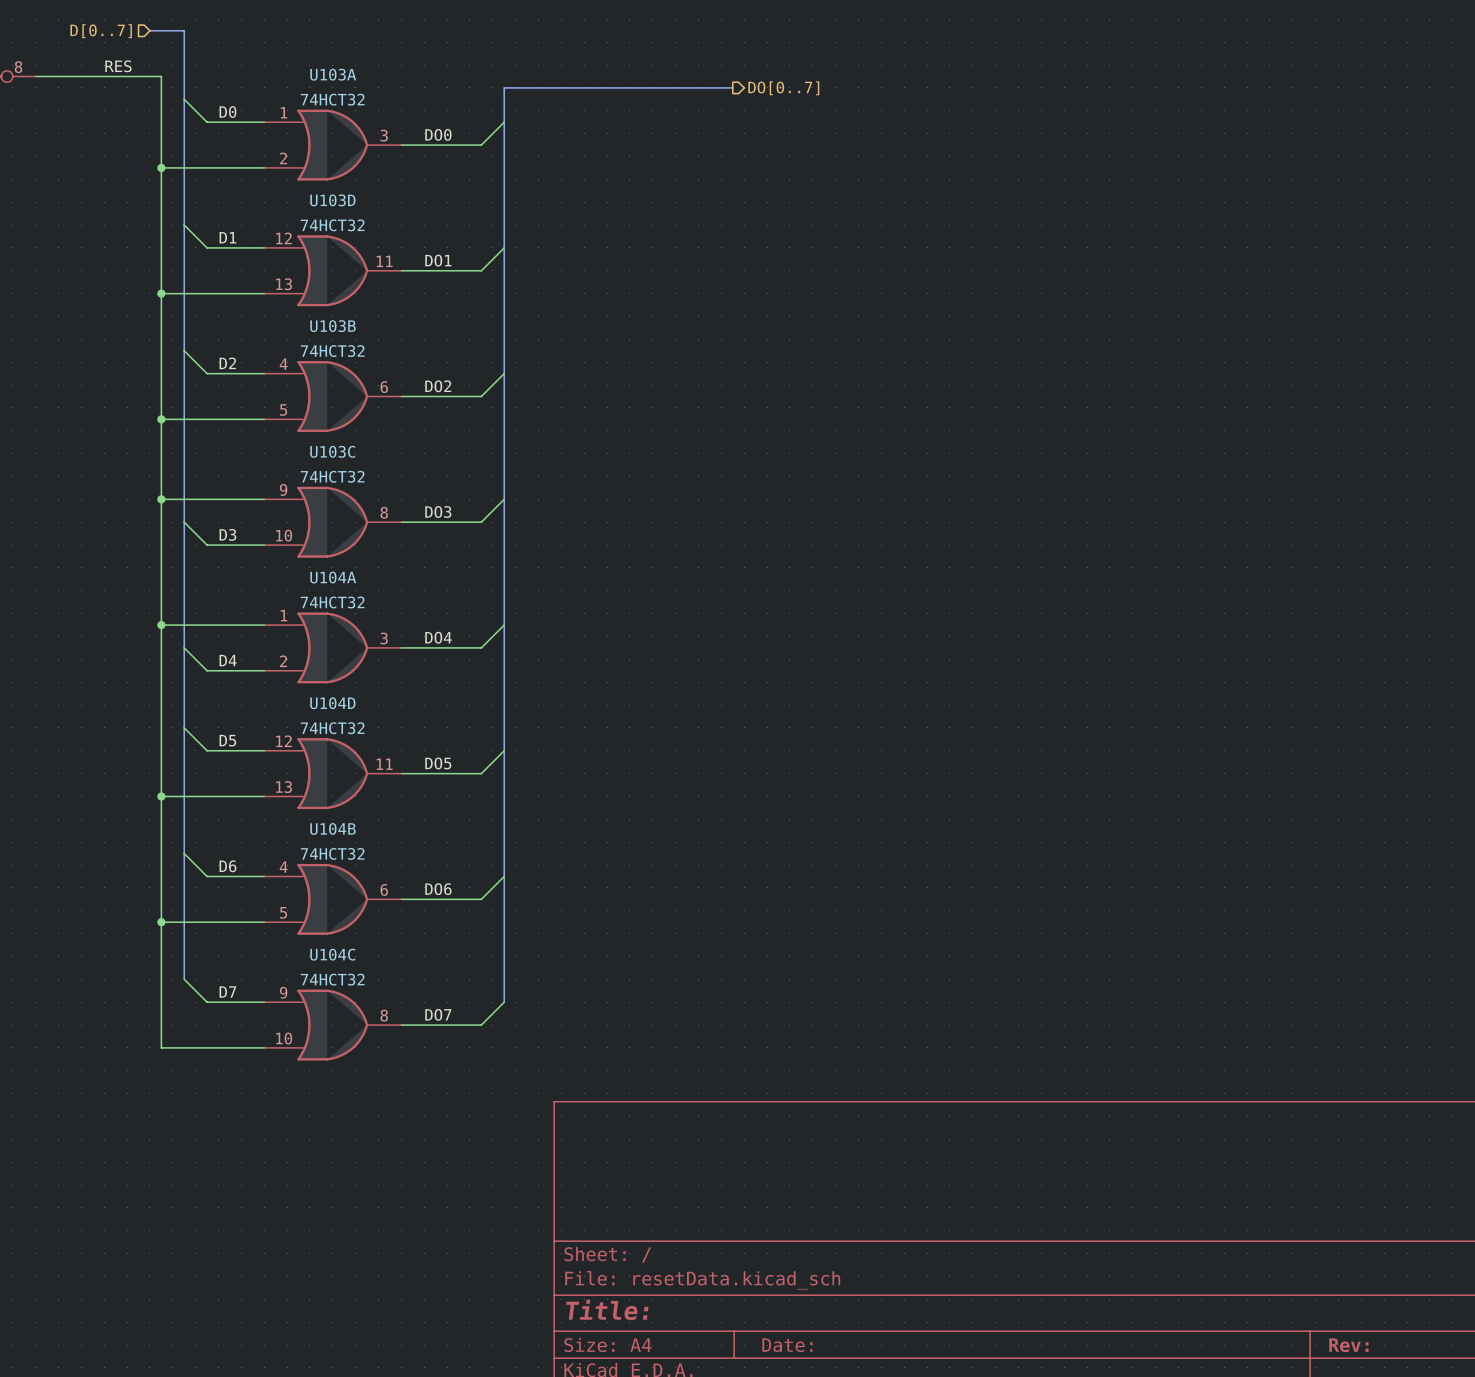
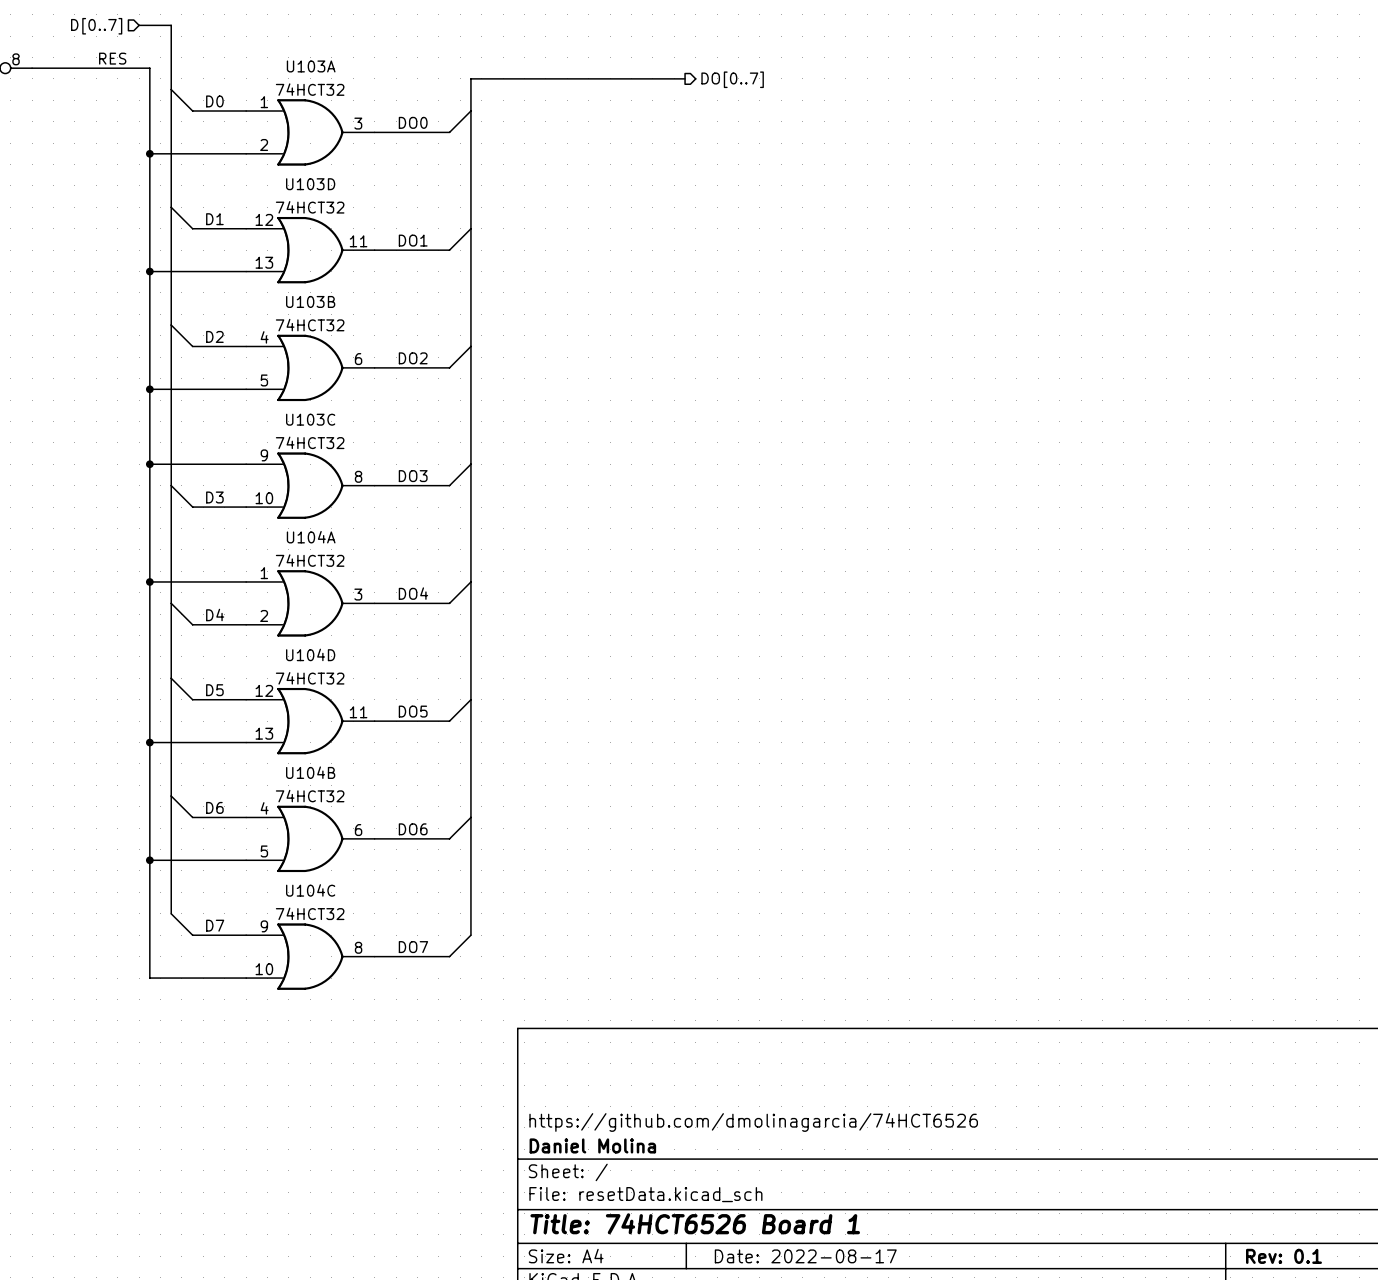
title block: none -> https://github.com/dmolinagarcia/74HCT6526 (753, 1122)
title block: none -> Daniel Molina (592, 1145)
title block: Title: (607, 1309) -> Title: 74HCT6526 Board 1 (695, 1223)
title block: Date: (787, 1345) -> Date: 2022-08-17 (805, 1256)
title block: Rev: (1348, 1345) -> Rev: 0.1 (1283, 1256)

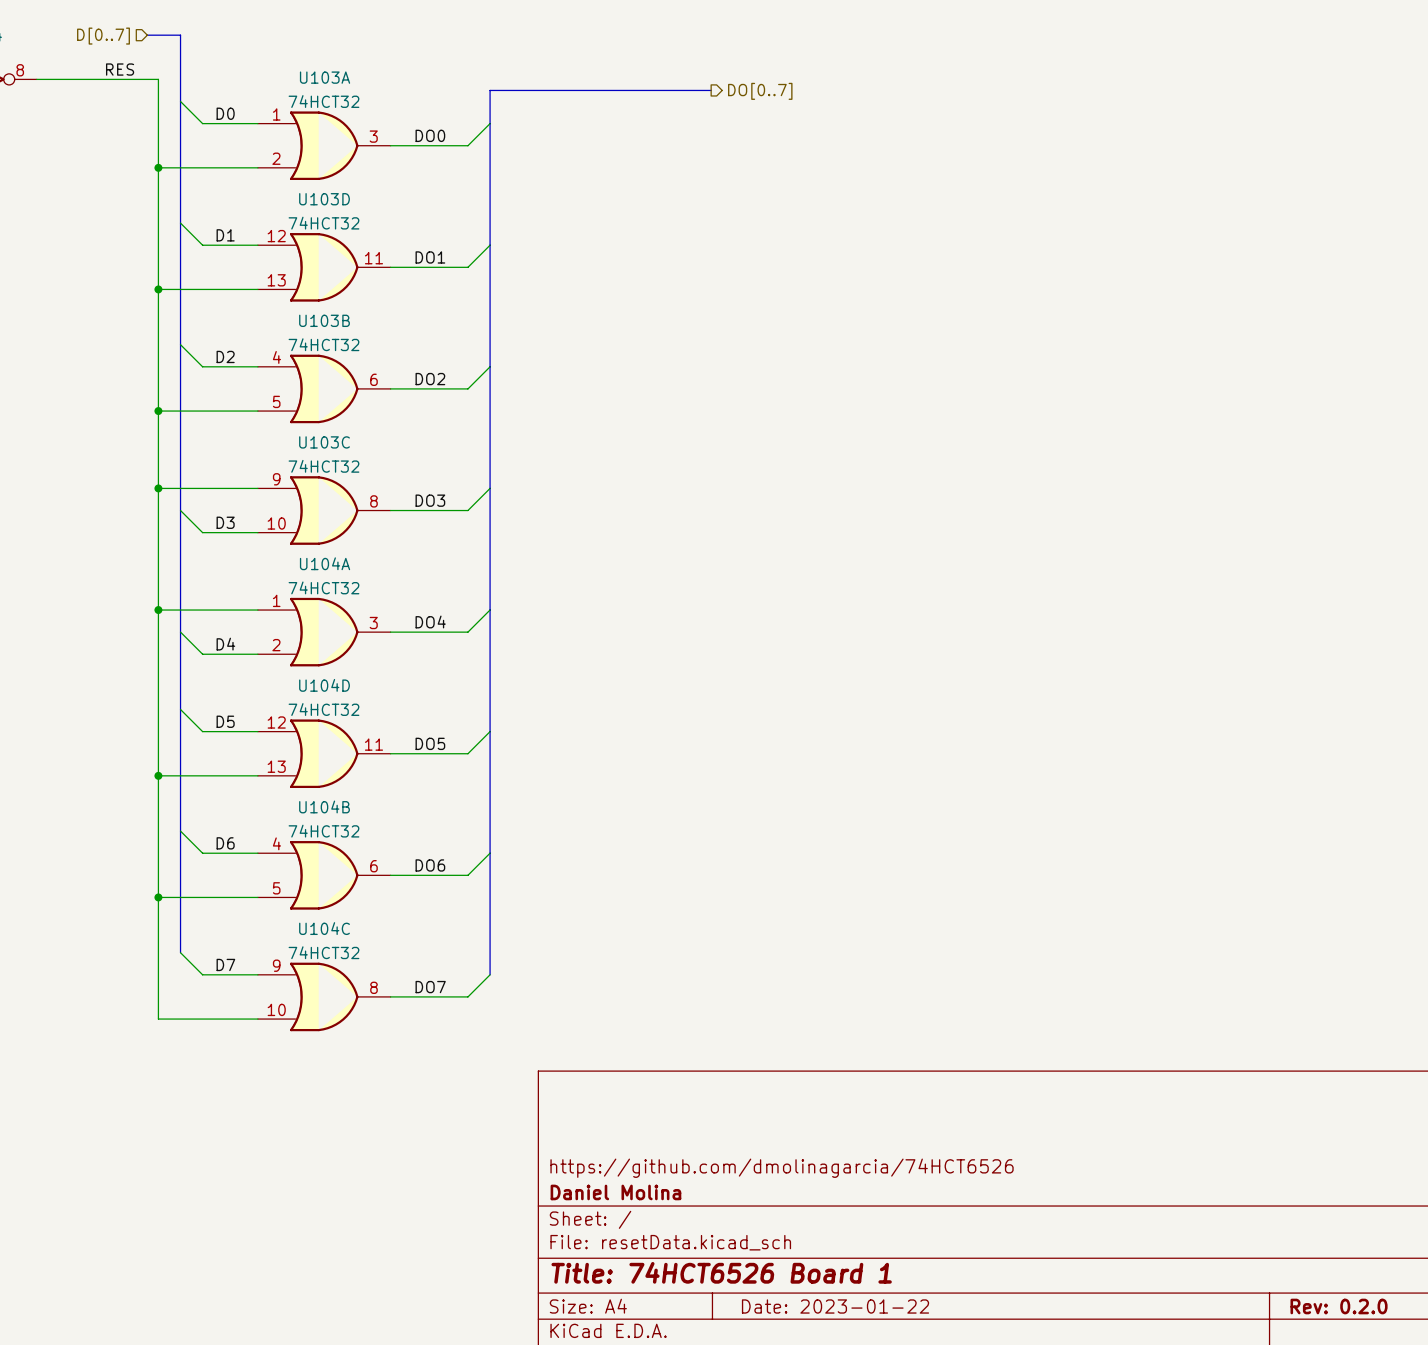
title block: Date: 2022-08-17 (805, 1256) -> Date: 2023-01-22 (835, 1306)
title block: Rev: 0.1 (1283, 1256) -> Rev: 0.2.0 (1339, 1306)

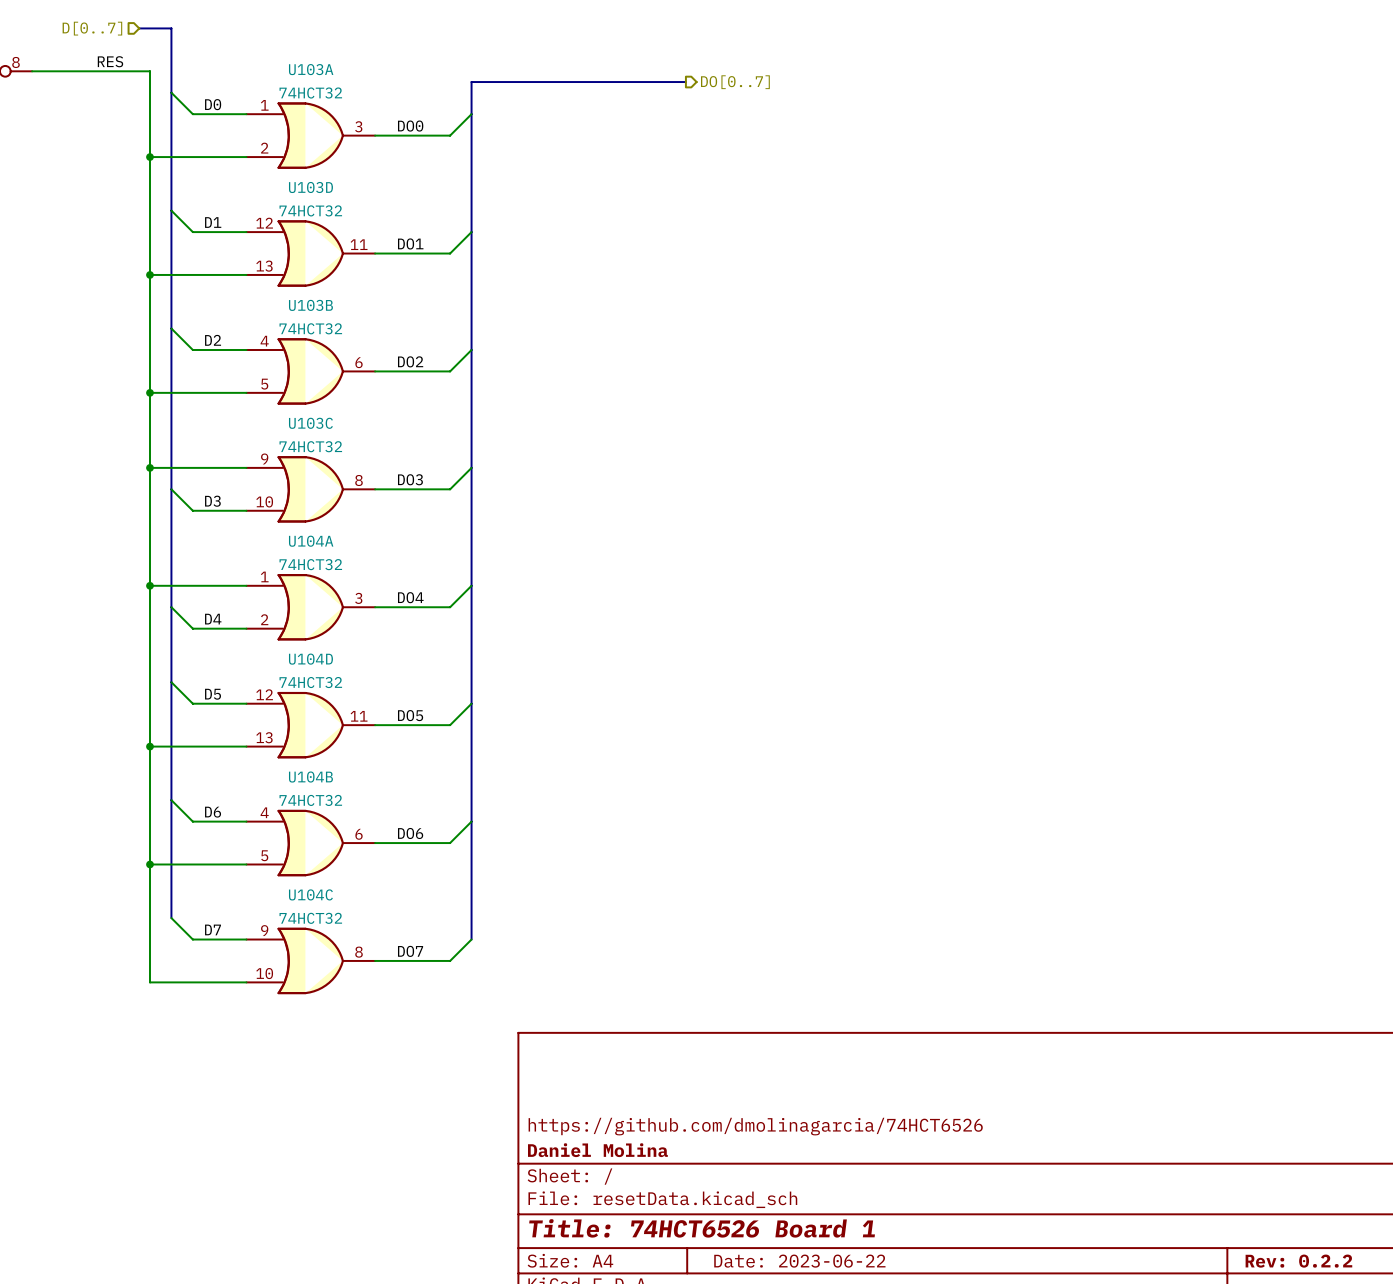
title block: Date: 2023-01-22 (835, 1306) -> Date: 2023-06-22 (799, 1261)
title block: Rev: 0.2.0 (1339, 1306) -> Rev: 0.2.2 (1298, 1261)

